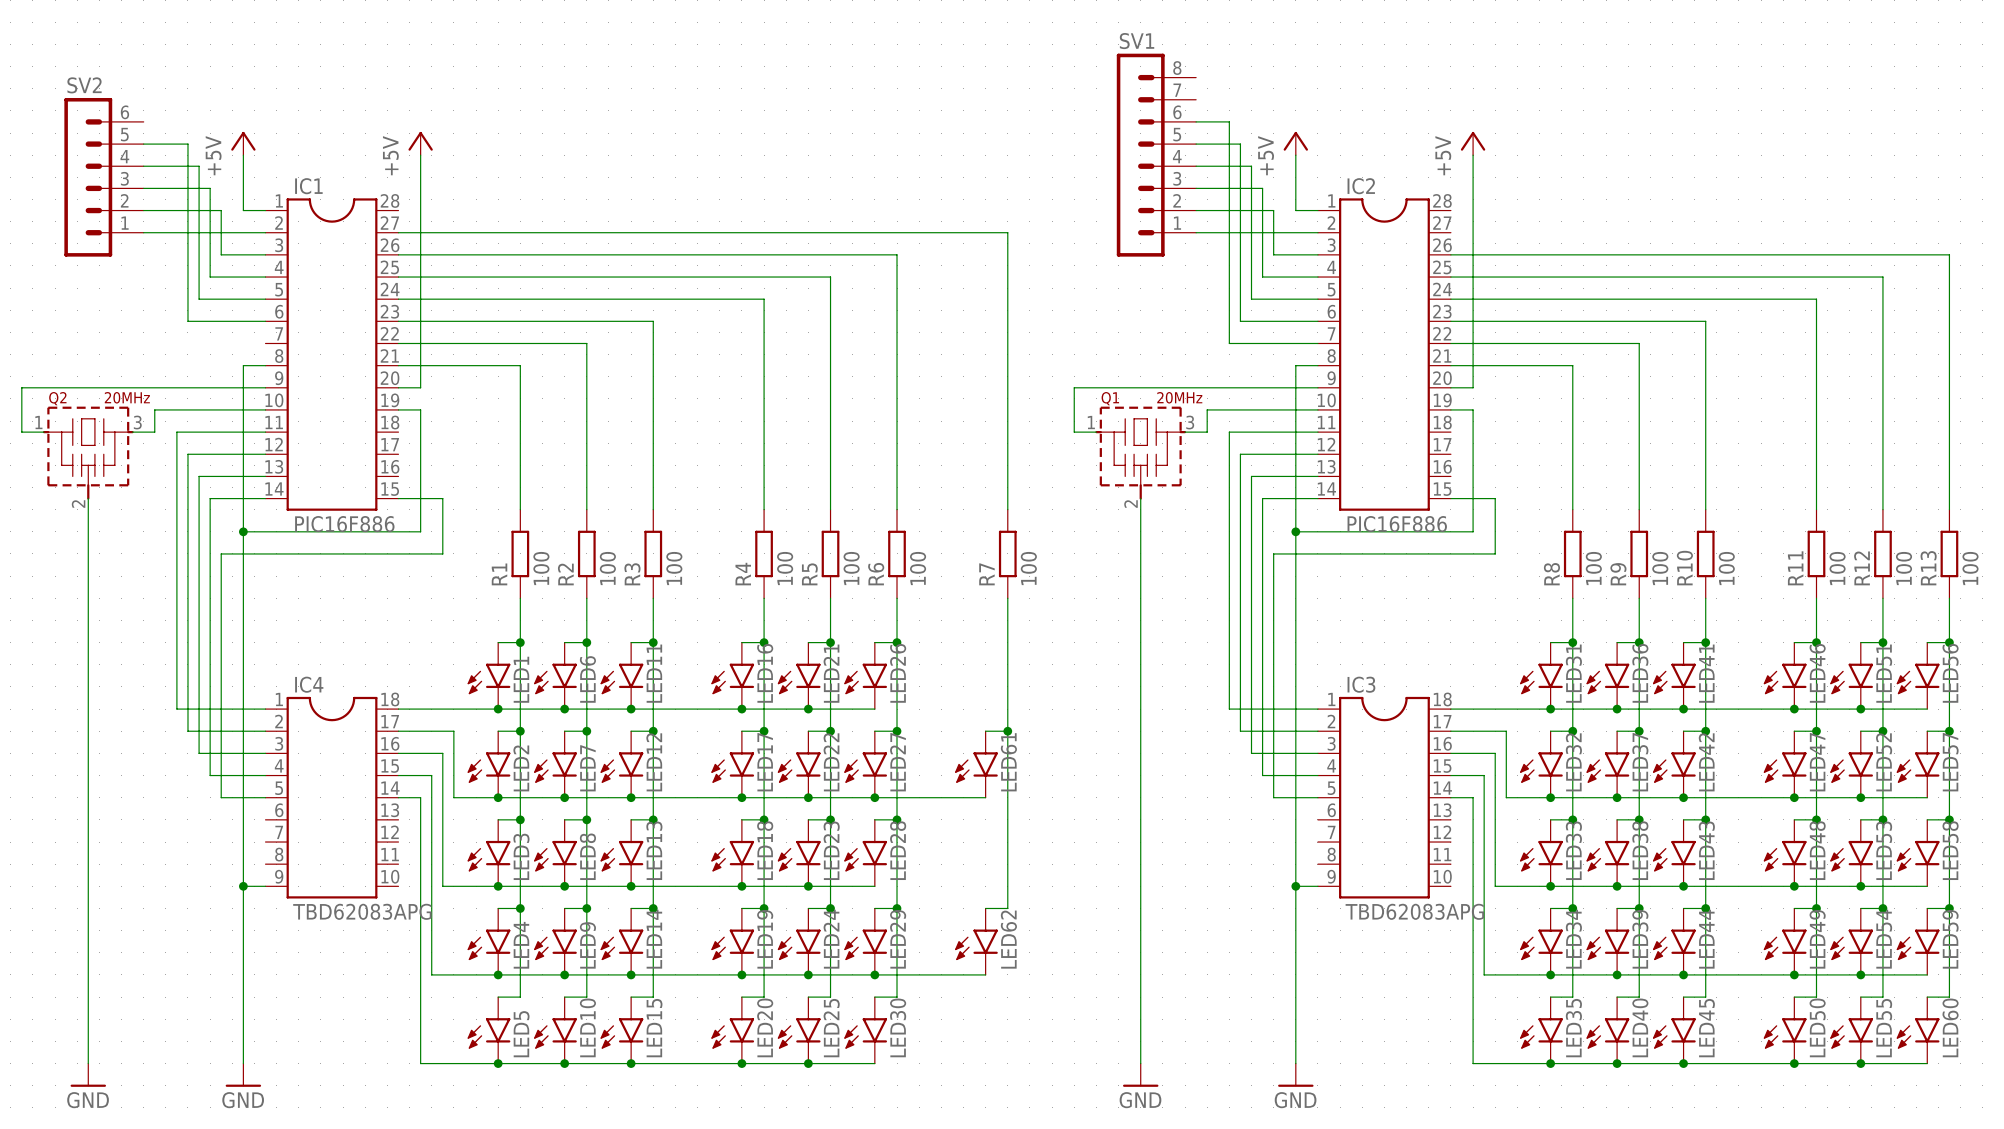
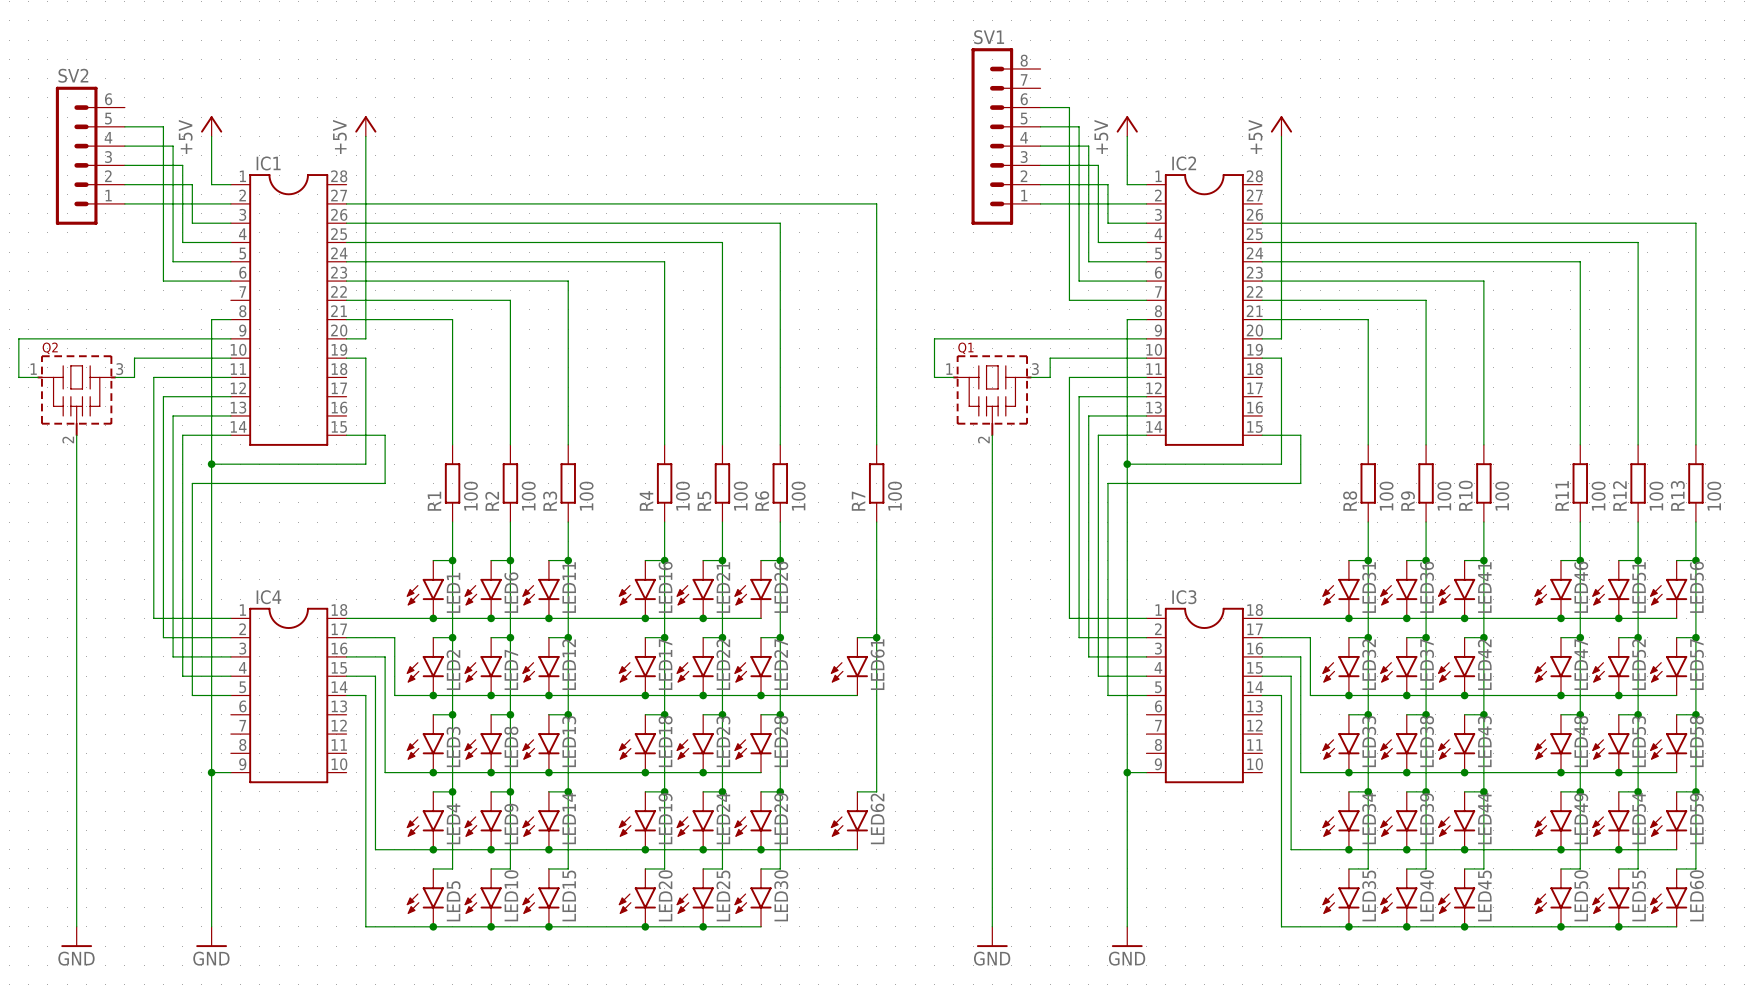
Q2 value: 20MHz (127, 397) -> none
Q1 value: 20MHz (1179, 397) -> none
IC1 value: PIC16F886 (344, 524) -> none
IC2 value: PIC16F886 (1397, 524) -> none
IC4 value: TBD62083APG (362, 911) -> none
IC3 value: TBD62083APG (1414, 911) -> none

